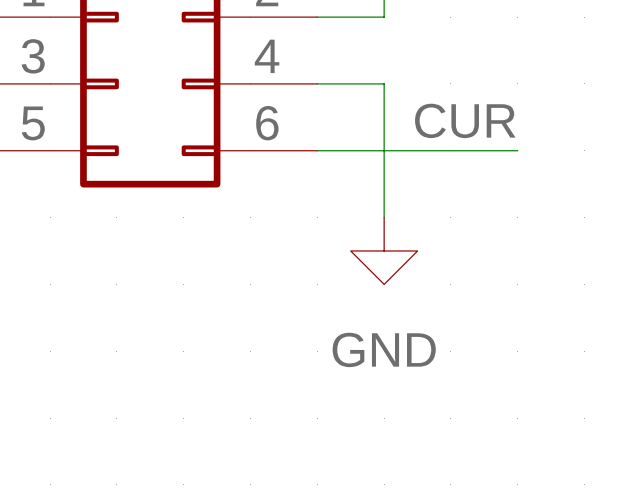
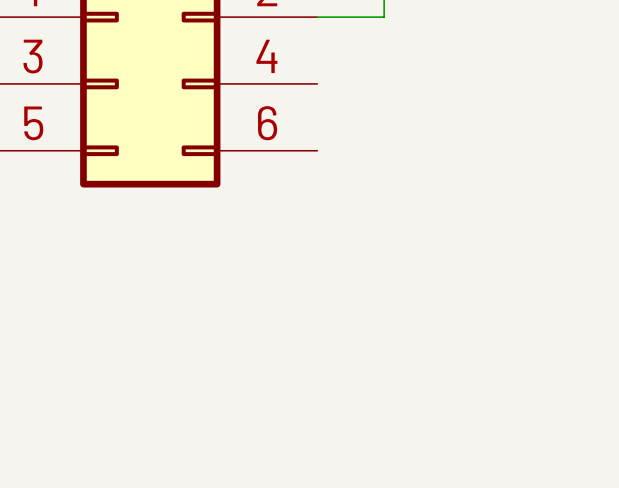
wire: (317, 83) (384, 83) (384, 217) -> none
label: CUR (465, 120) -> none
wire: (317, 150) (517, 150) -> none
power symbol: GND (384, 250) -> none

